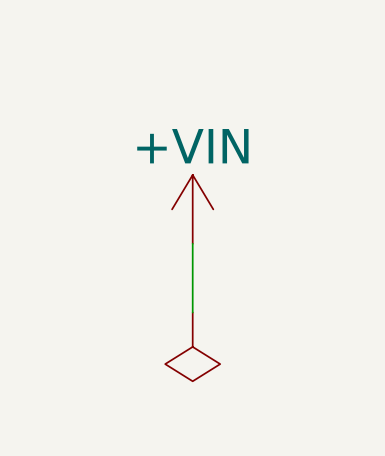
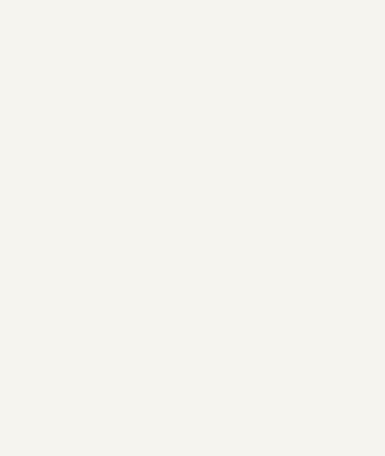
power symbol: +VIN (192, 209) -> none
wire: (192, 243) (192, 312) -> none
power symbol: (192, 346) -> none

